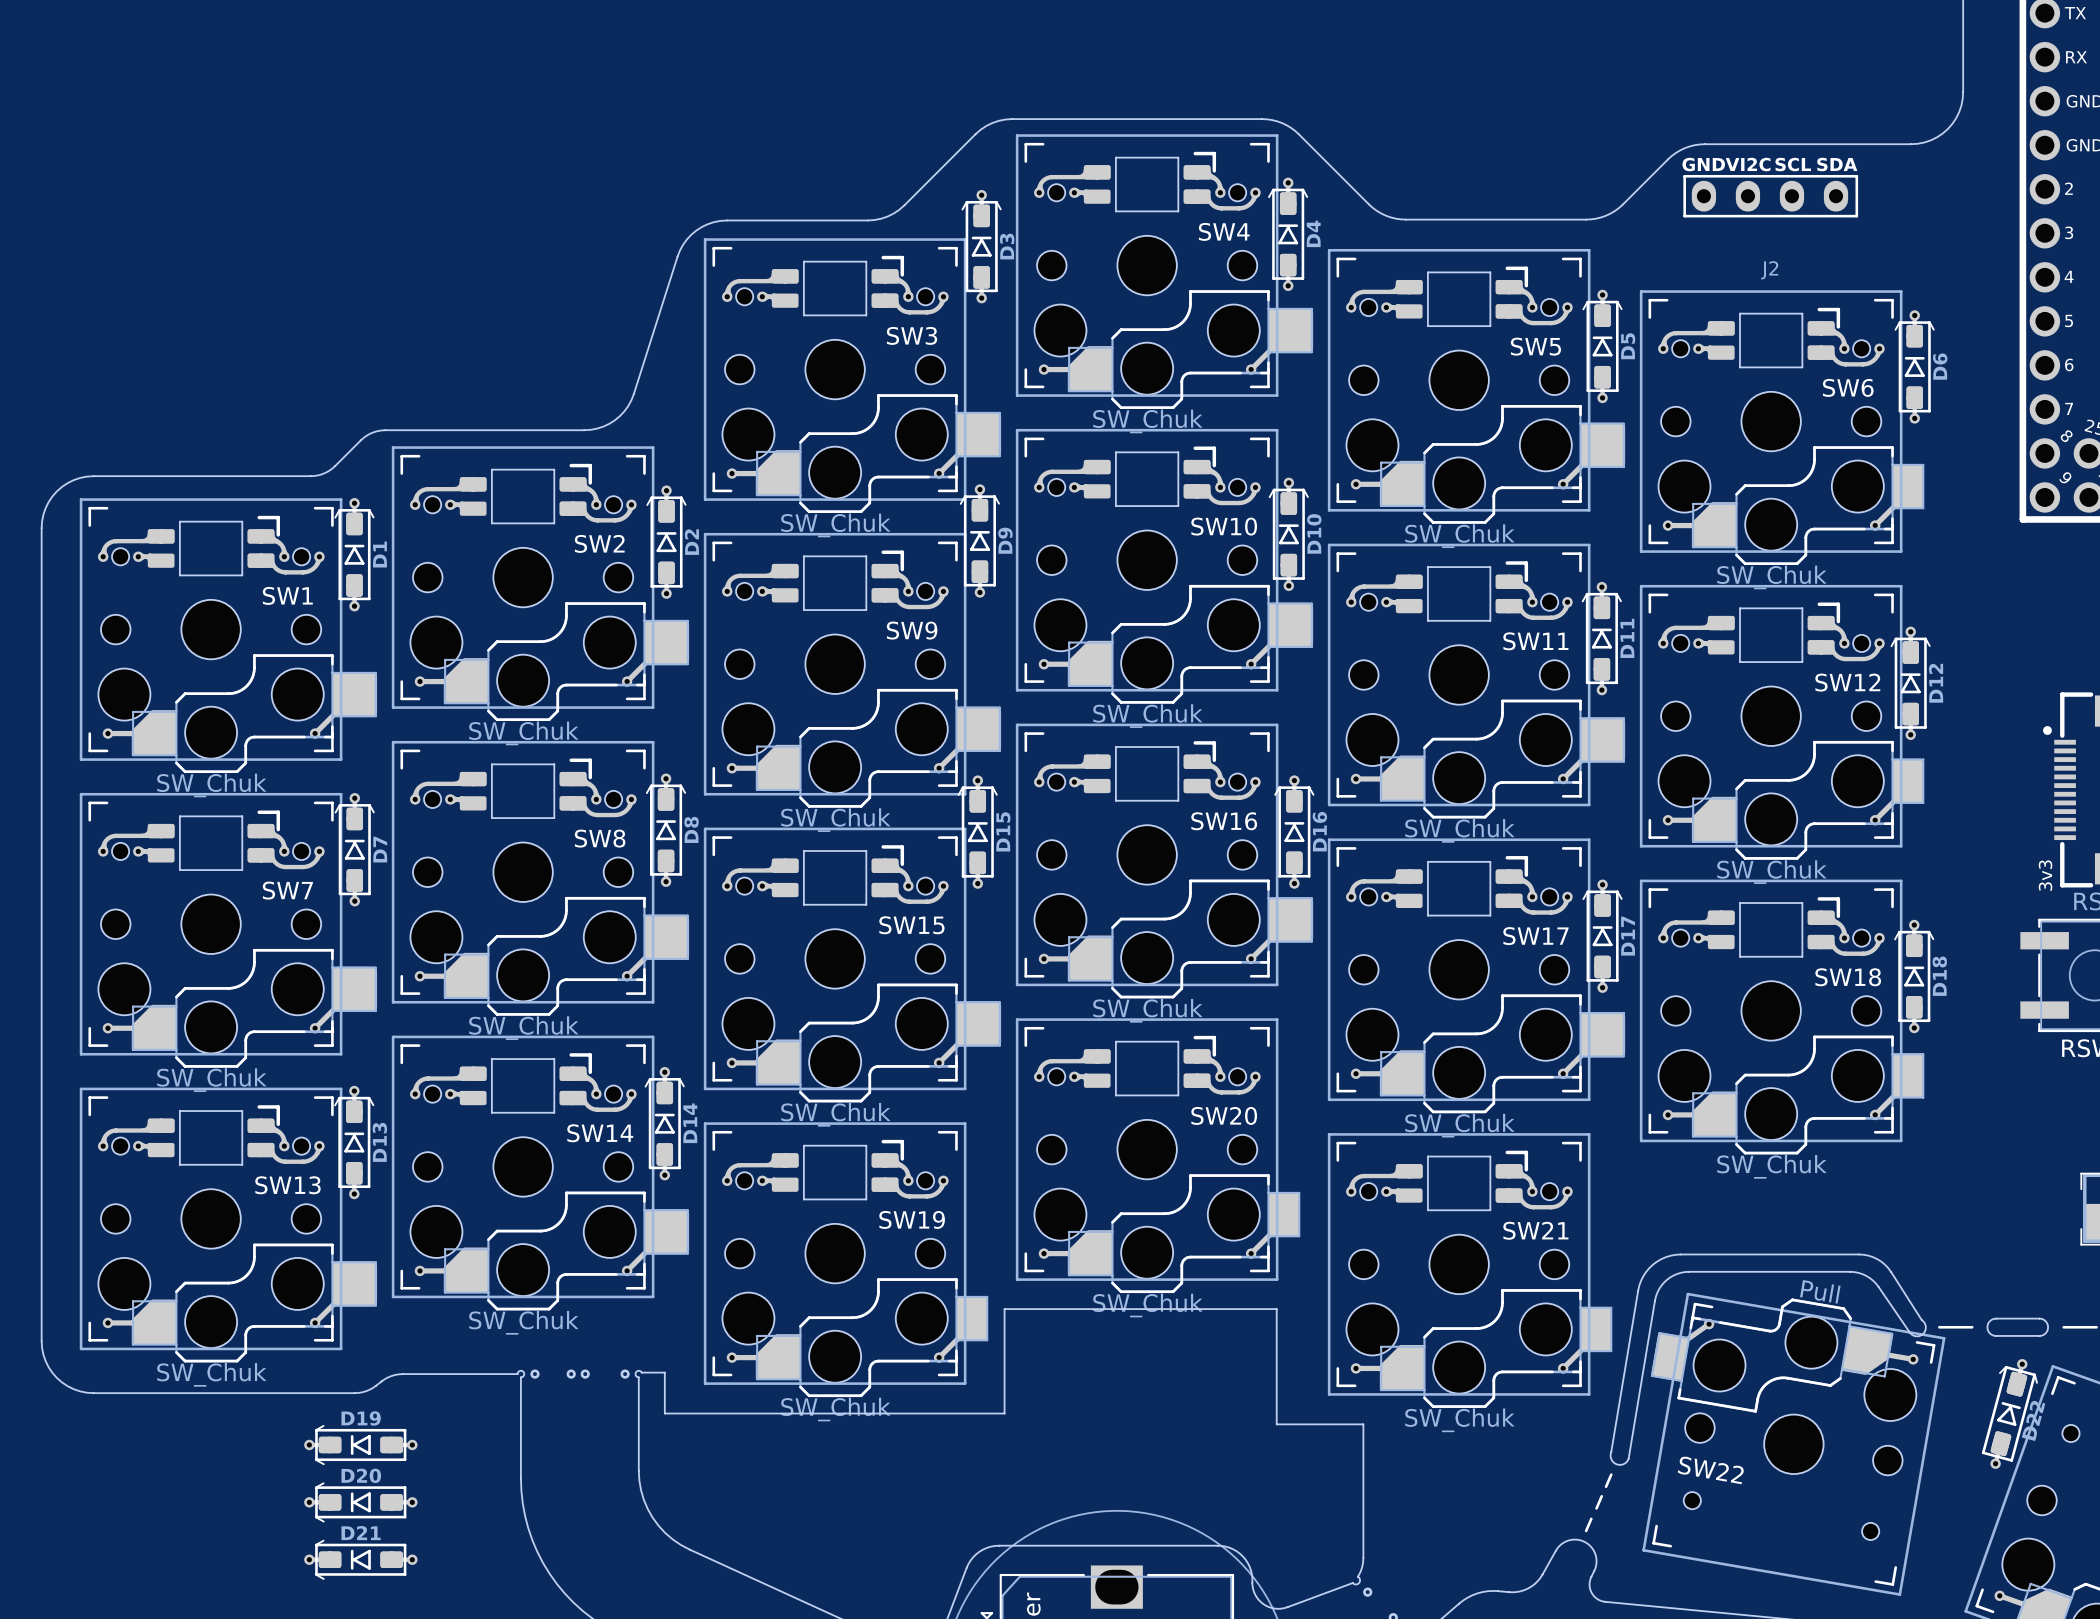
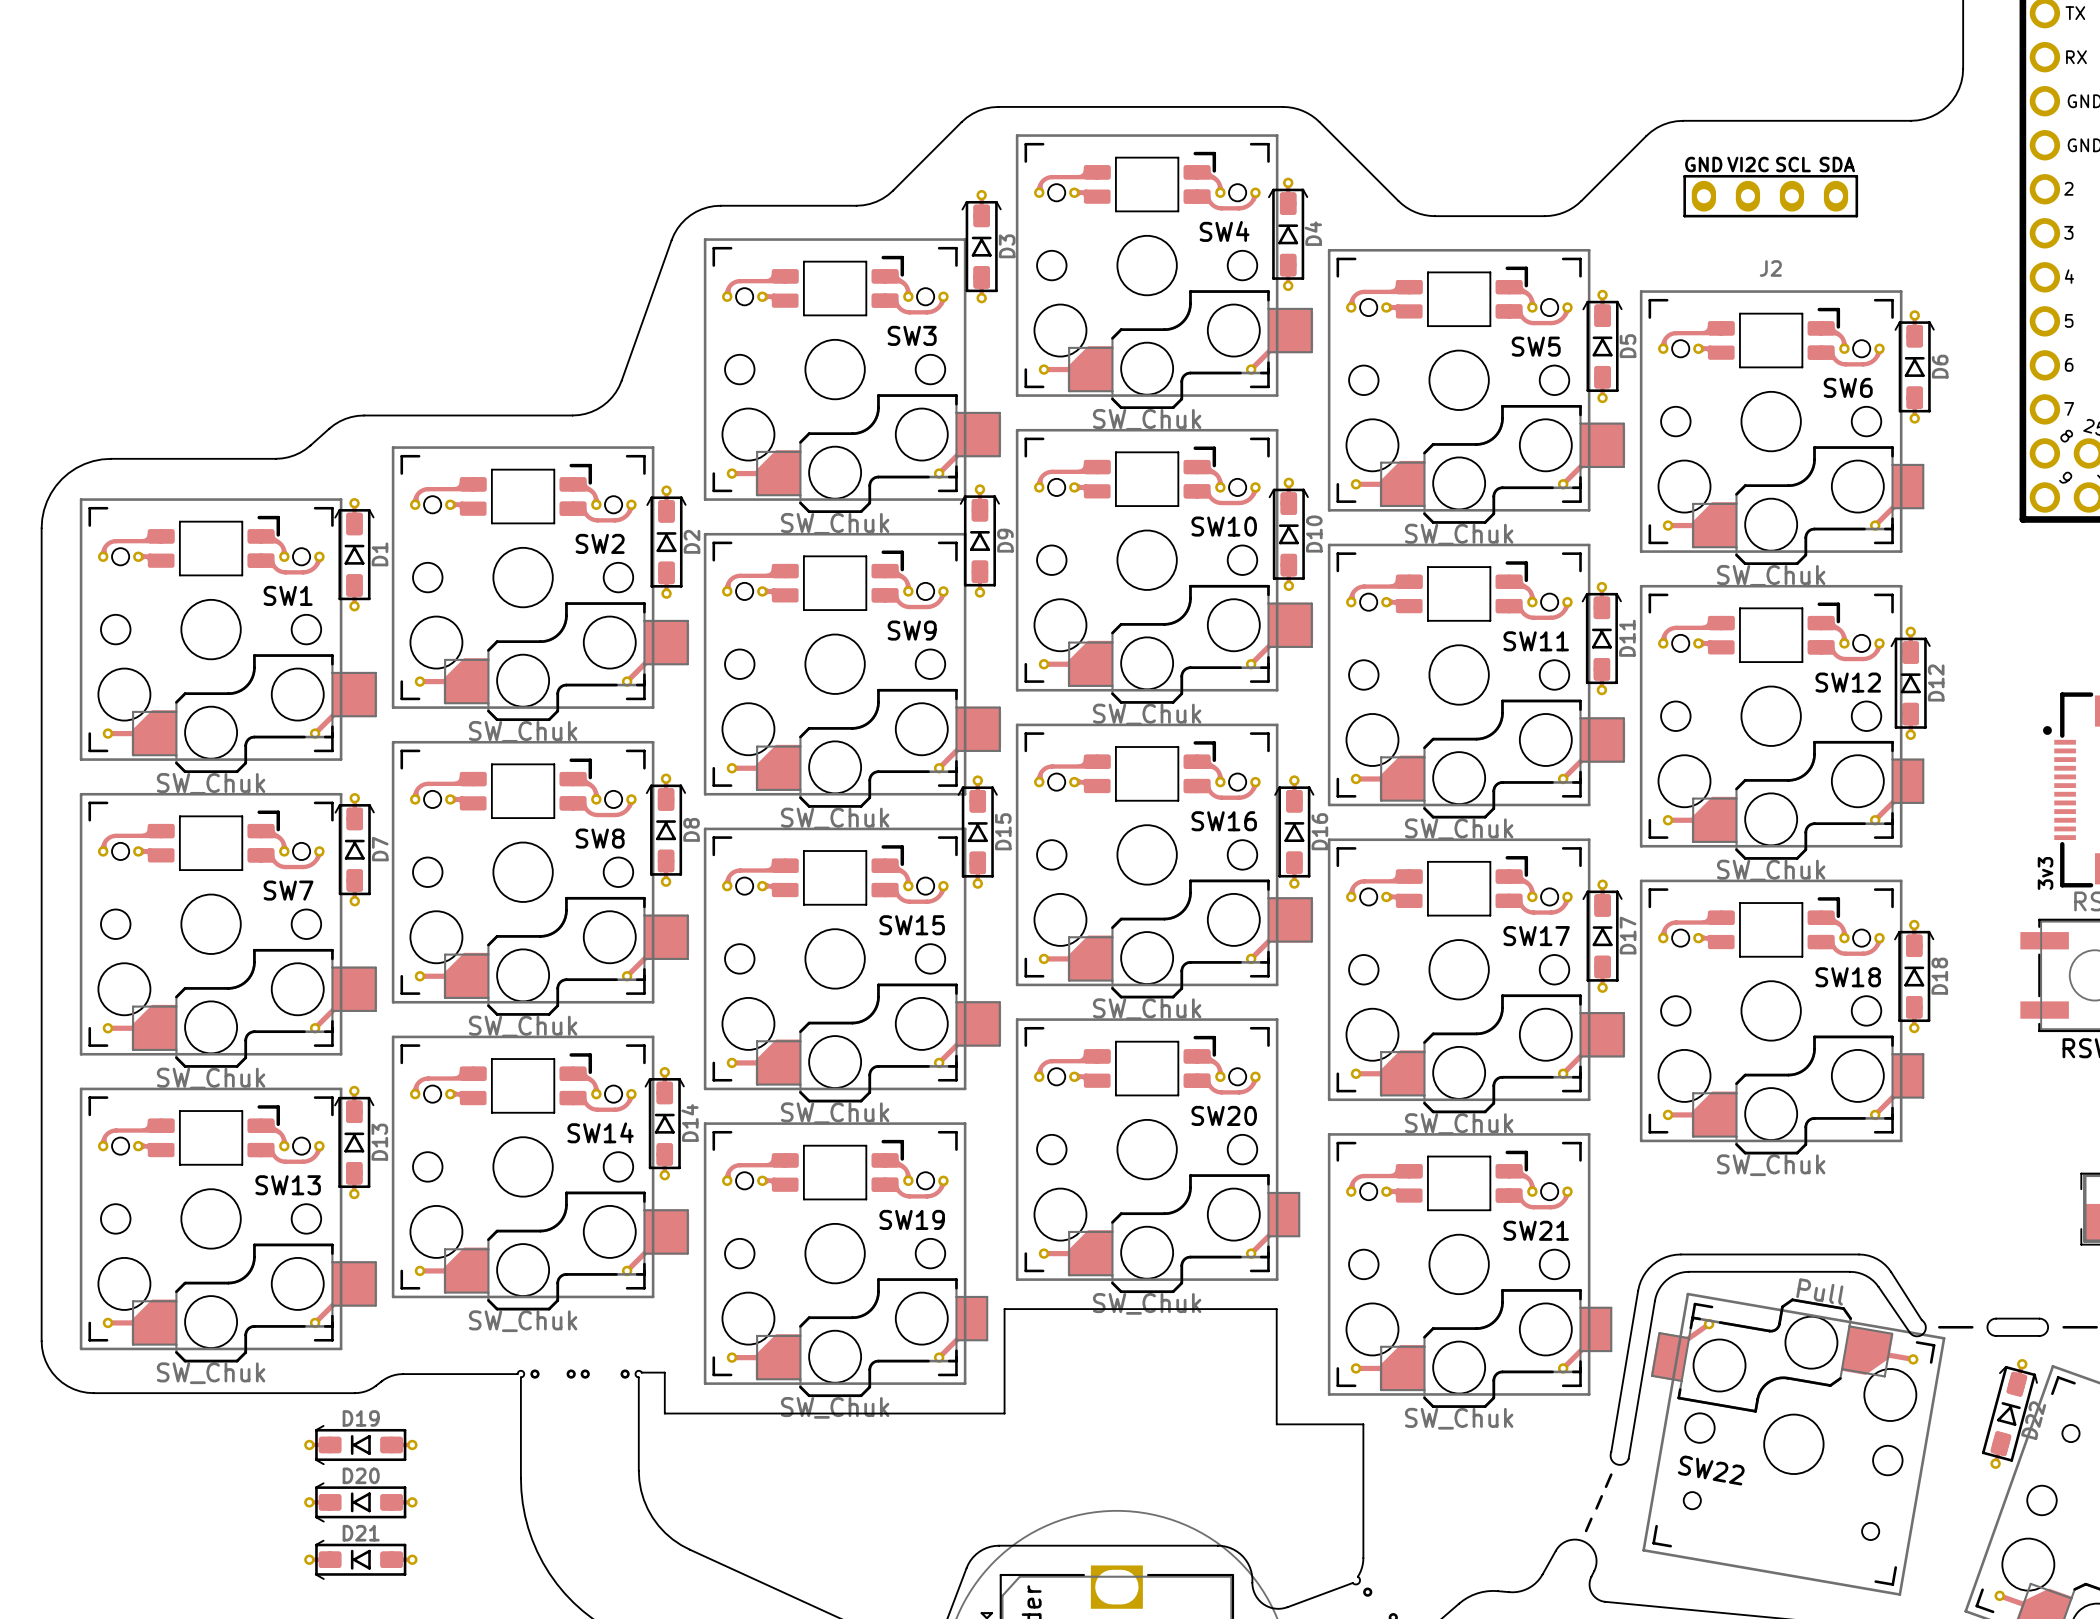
board edge: (1963, 68) (1962, 99) (1959, 112) (1947, 128) (1931, 140) (1911, 144) (1694, 145) (1671, 156) (1615, 210) (1591, 219) (1405, 219) (1390, 217) (1372, 207) (1295, 130) (1272, 120) (1012, 119) (998, 120) (980, 129) (904, 205) (887, 216) (867, 220) (720, 220) (707, 224) (696, 230) (683, 244) (677, 256) (631, 400) (620, 416) (603, 426) (584, 430) (380, 430) (364, 437) (329, 470) (314, 476) (86, 476) (67, 483) (52, 496) (45, 508) (41, 528) -> (1963, 68) (1959, 88) (1947, 105) (1937, 113) (1917, 120) (1683, 120) (1663, 124) (1646, 136) (1577, 204) (1559, 213) (1544, 216) (1435, 216) (1415, 212) (1398, 200) (1315, 118) (1293, 107) (998, 106) (984, 108) (966, 117) (893, 190) (876, 201) (856, 205) (714, 206) (701, 209) (690, 215) (681, 223) (671, 240) (619, 386) (607, 401) (591, 412) (572, 415) (357, 415) (339, 421) (305, 449) (294, 455) (282, 458) (110, 458) (93, 461) (76, 468) (55, 485) (44, 510) (41, 528)

